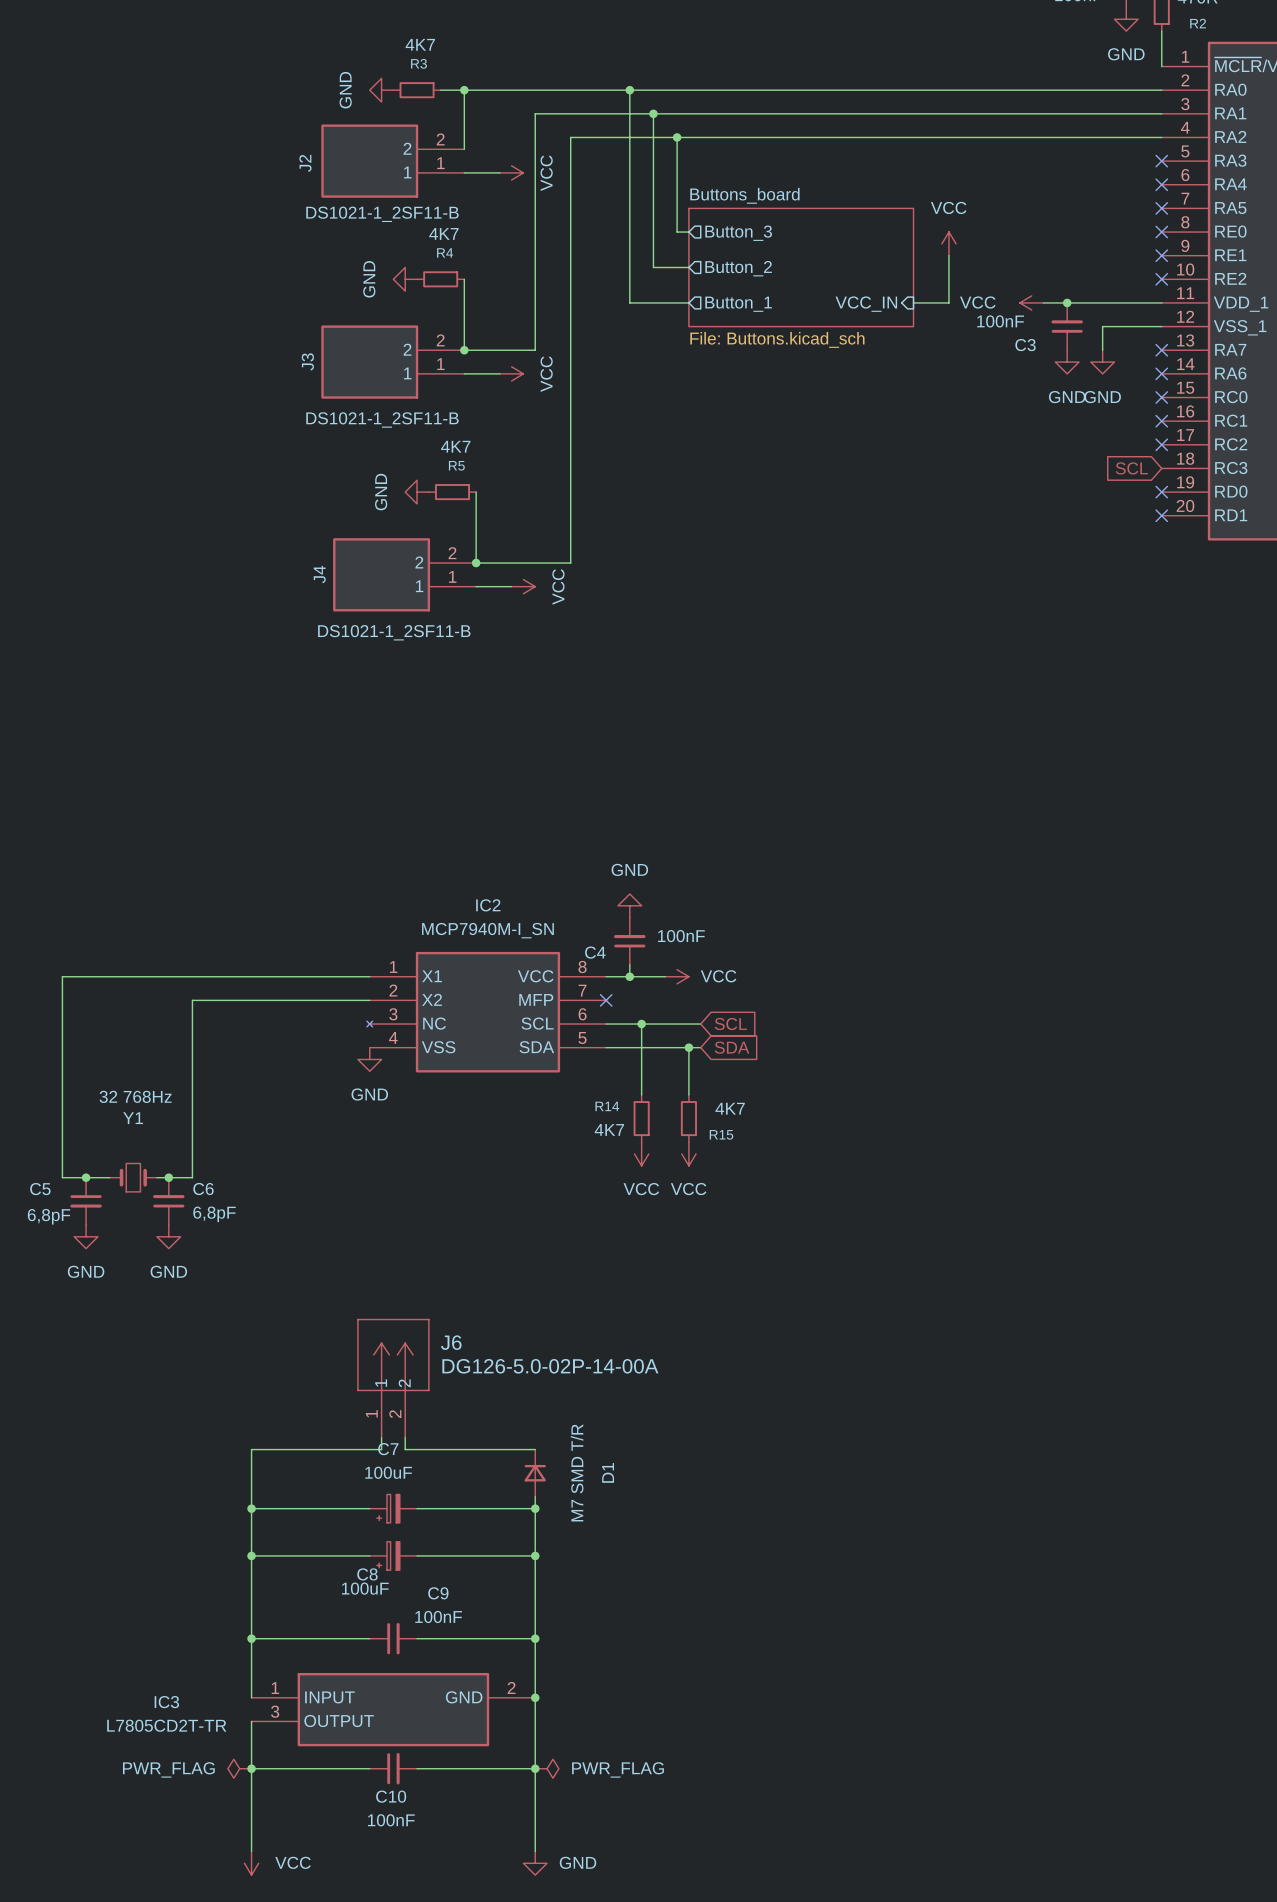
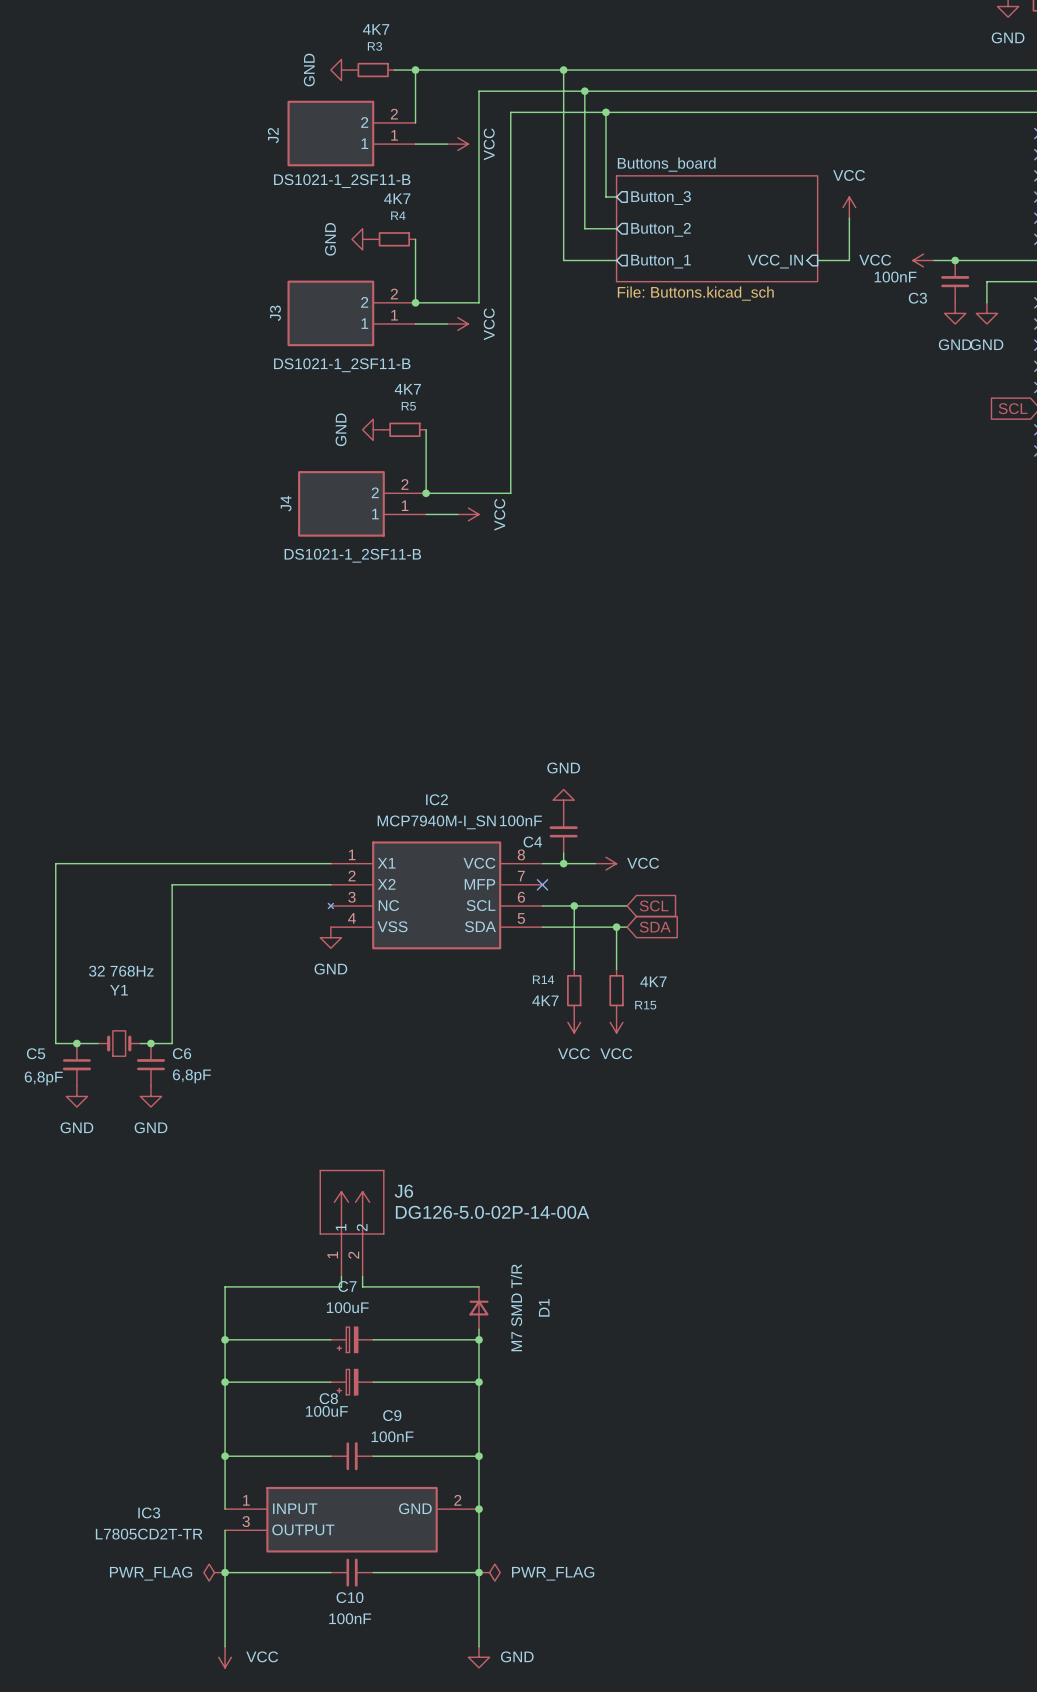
C4 value position: 100nF (681, 936) -> 100nF (520, 820)

